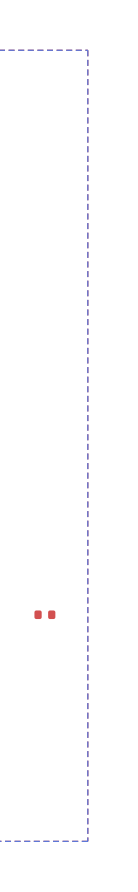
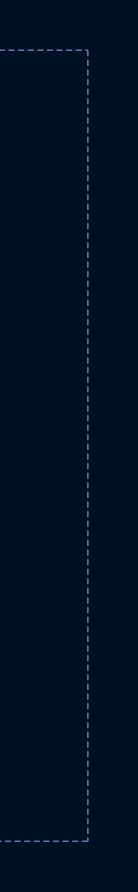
part: (44, 614) -> none

